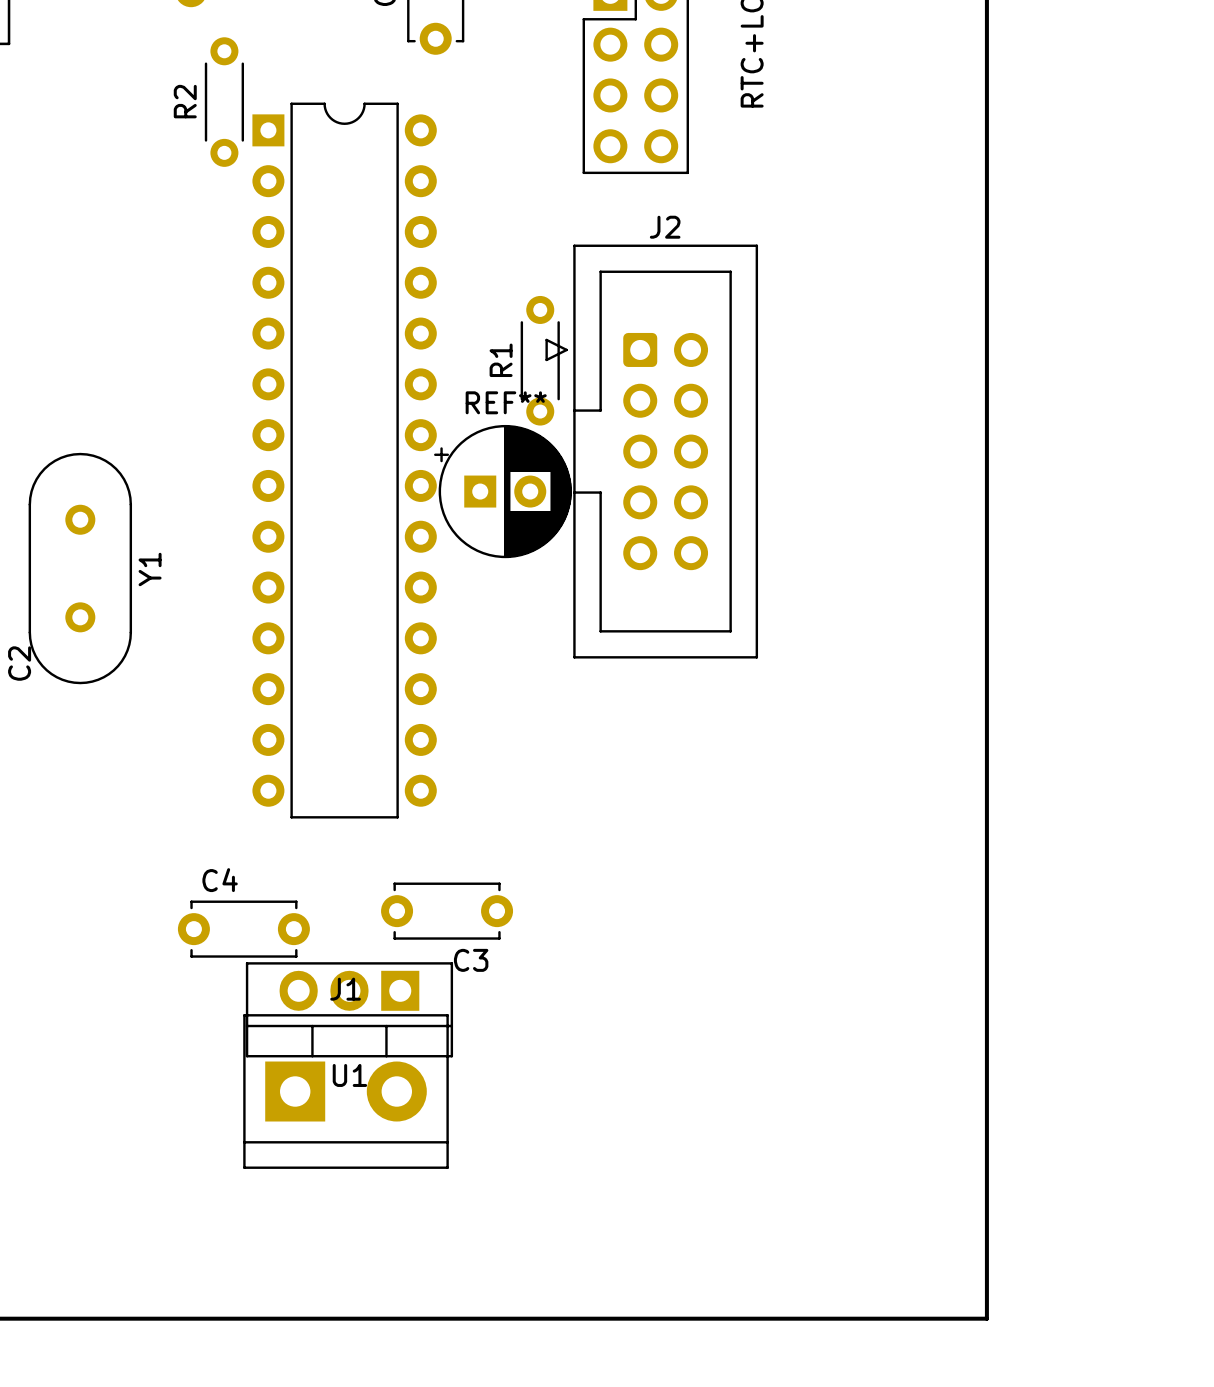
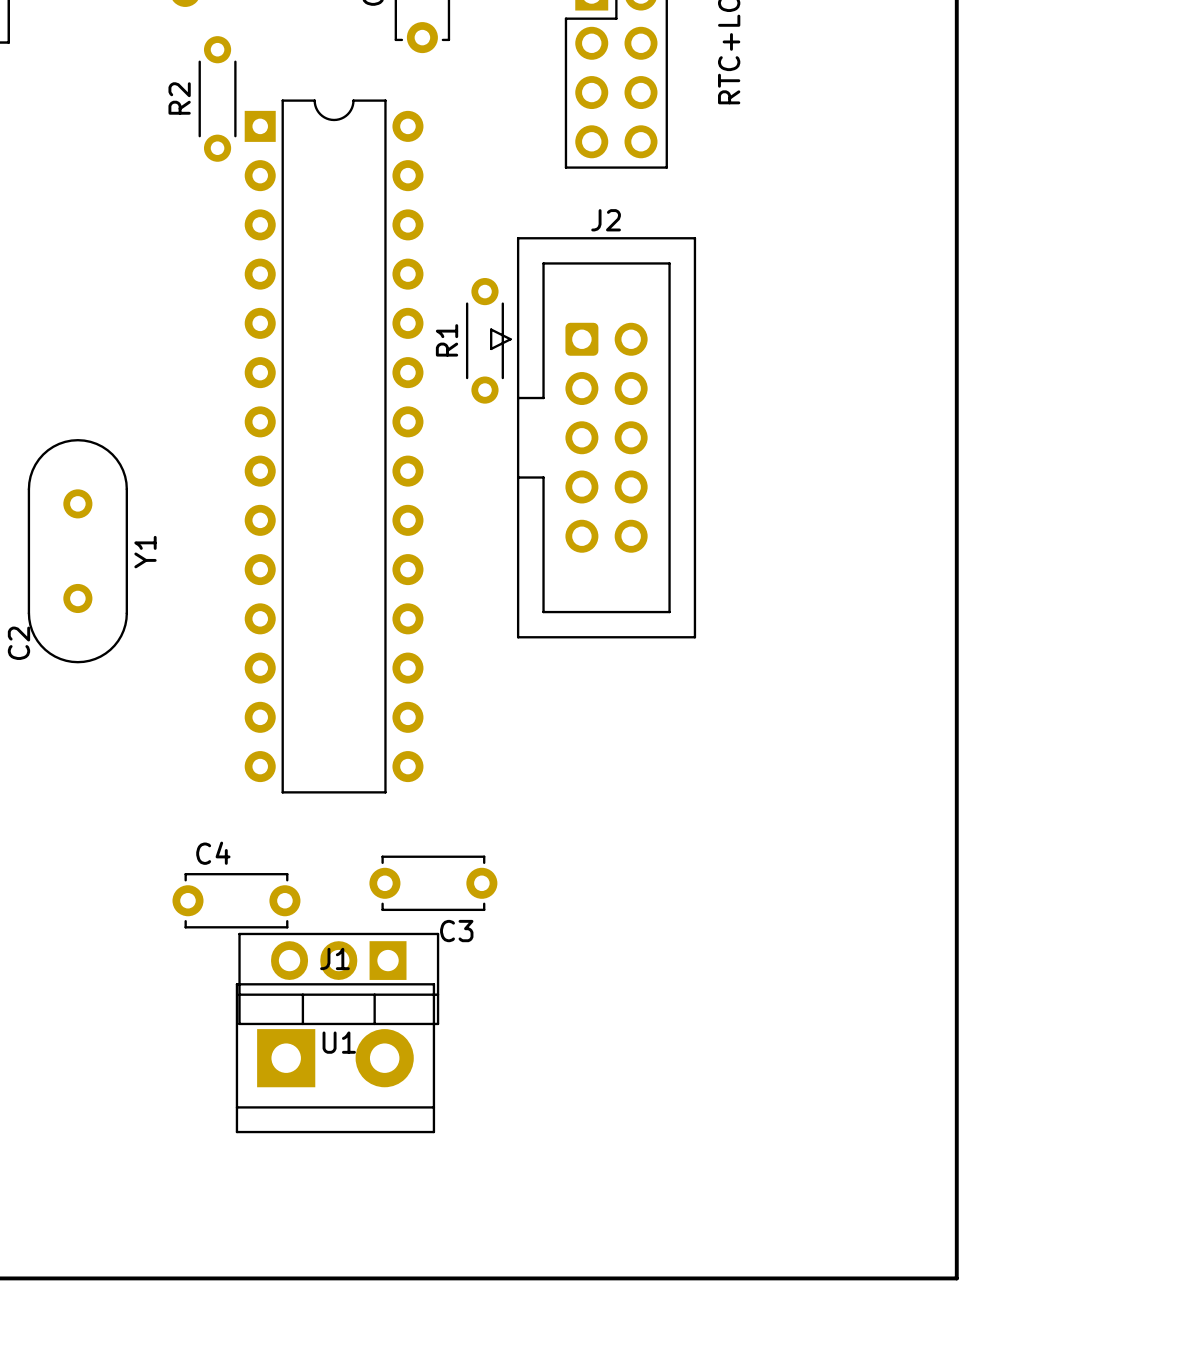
R1 position: (540, 360) -> (484, 340)
J2 position: (651, 451) -> (593, 437)
REF**: (502, 491) -> none

